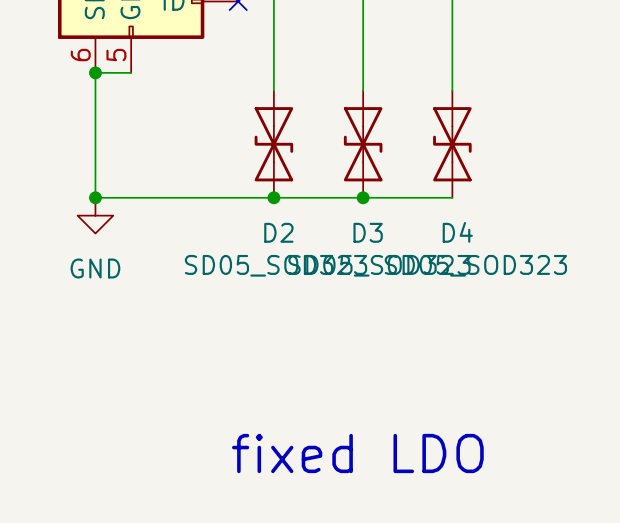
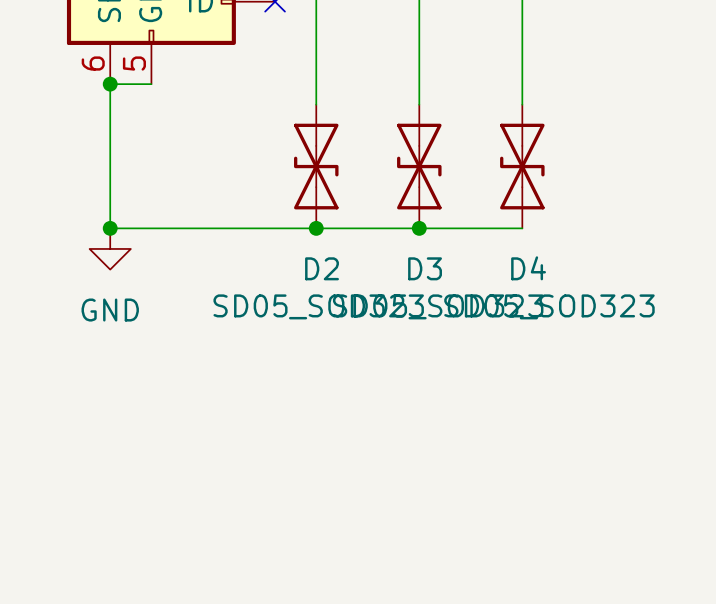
text: fixed LDO (357, 453) -> none

